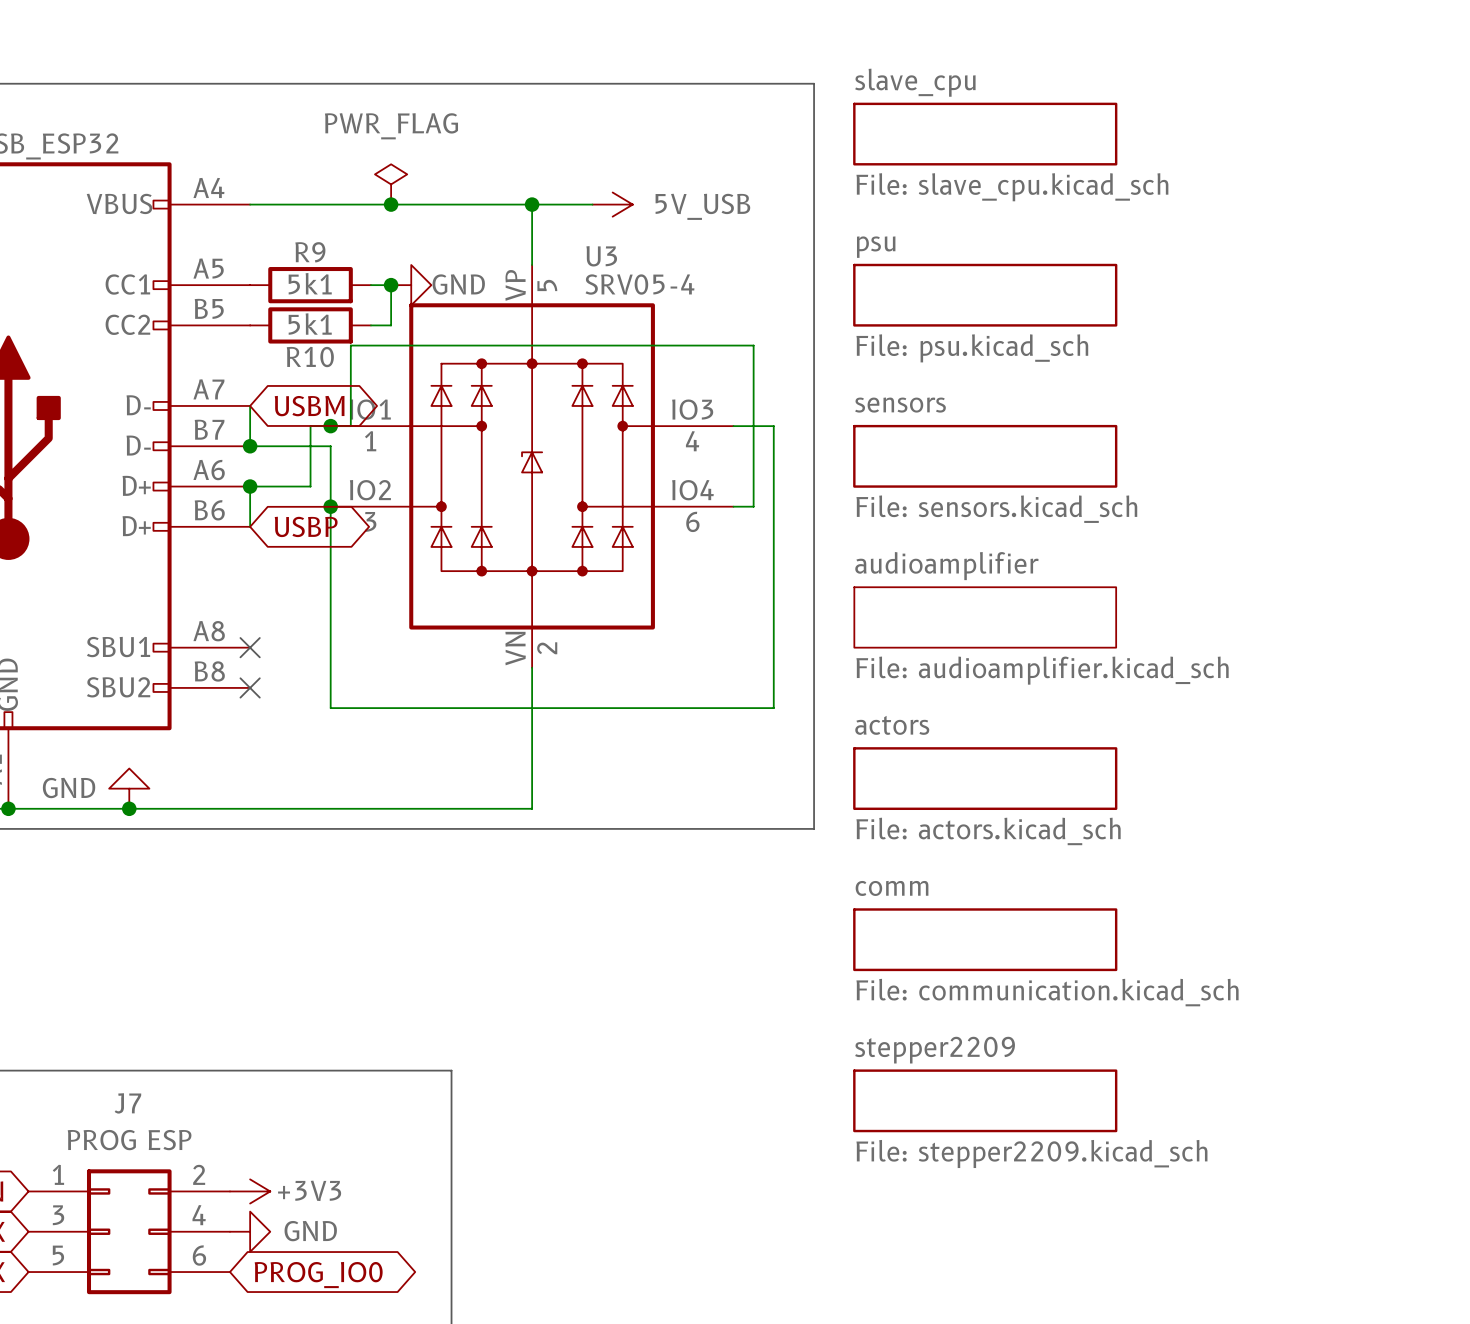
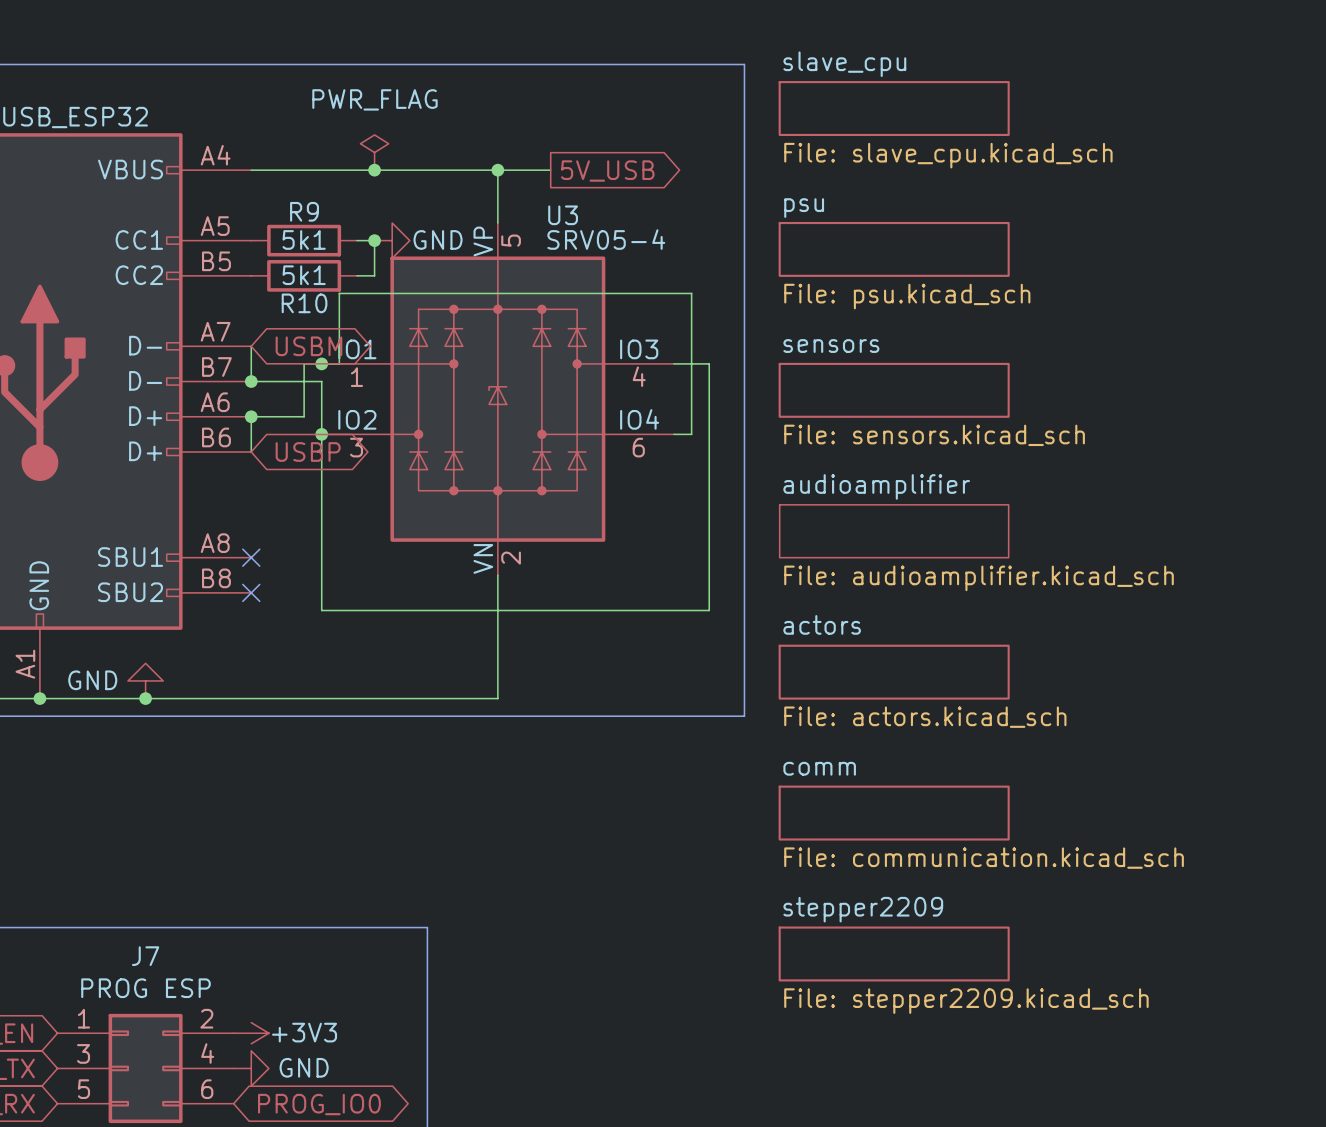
power symbol: 5V_USB (612, 204) -> none
global label: none -> 5V_USB (607, 171)

